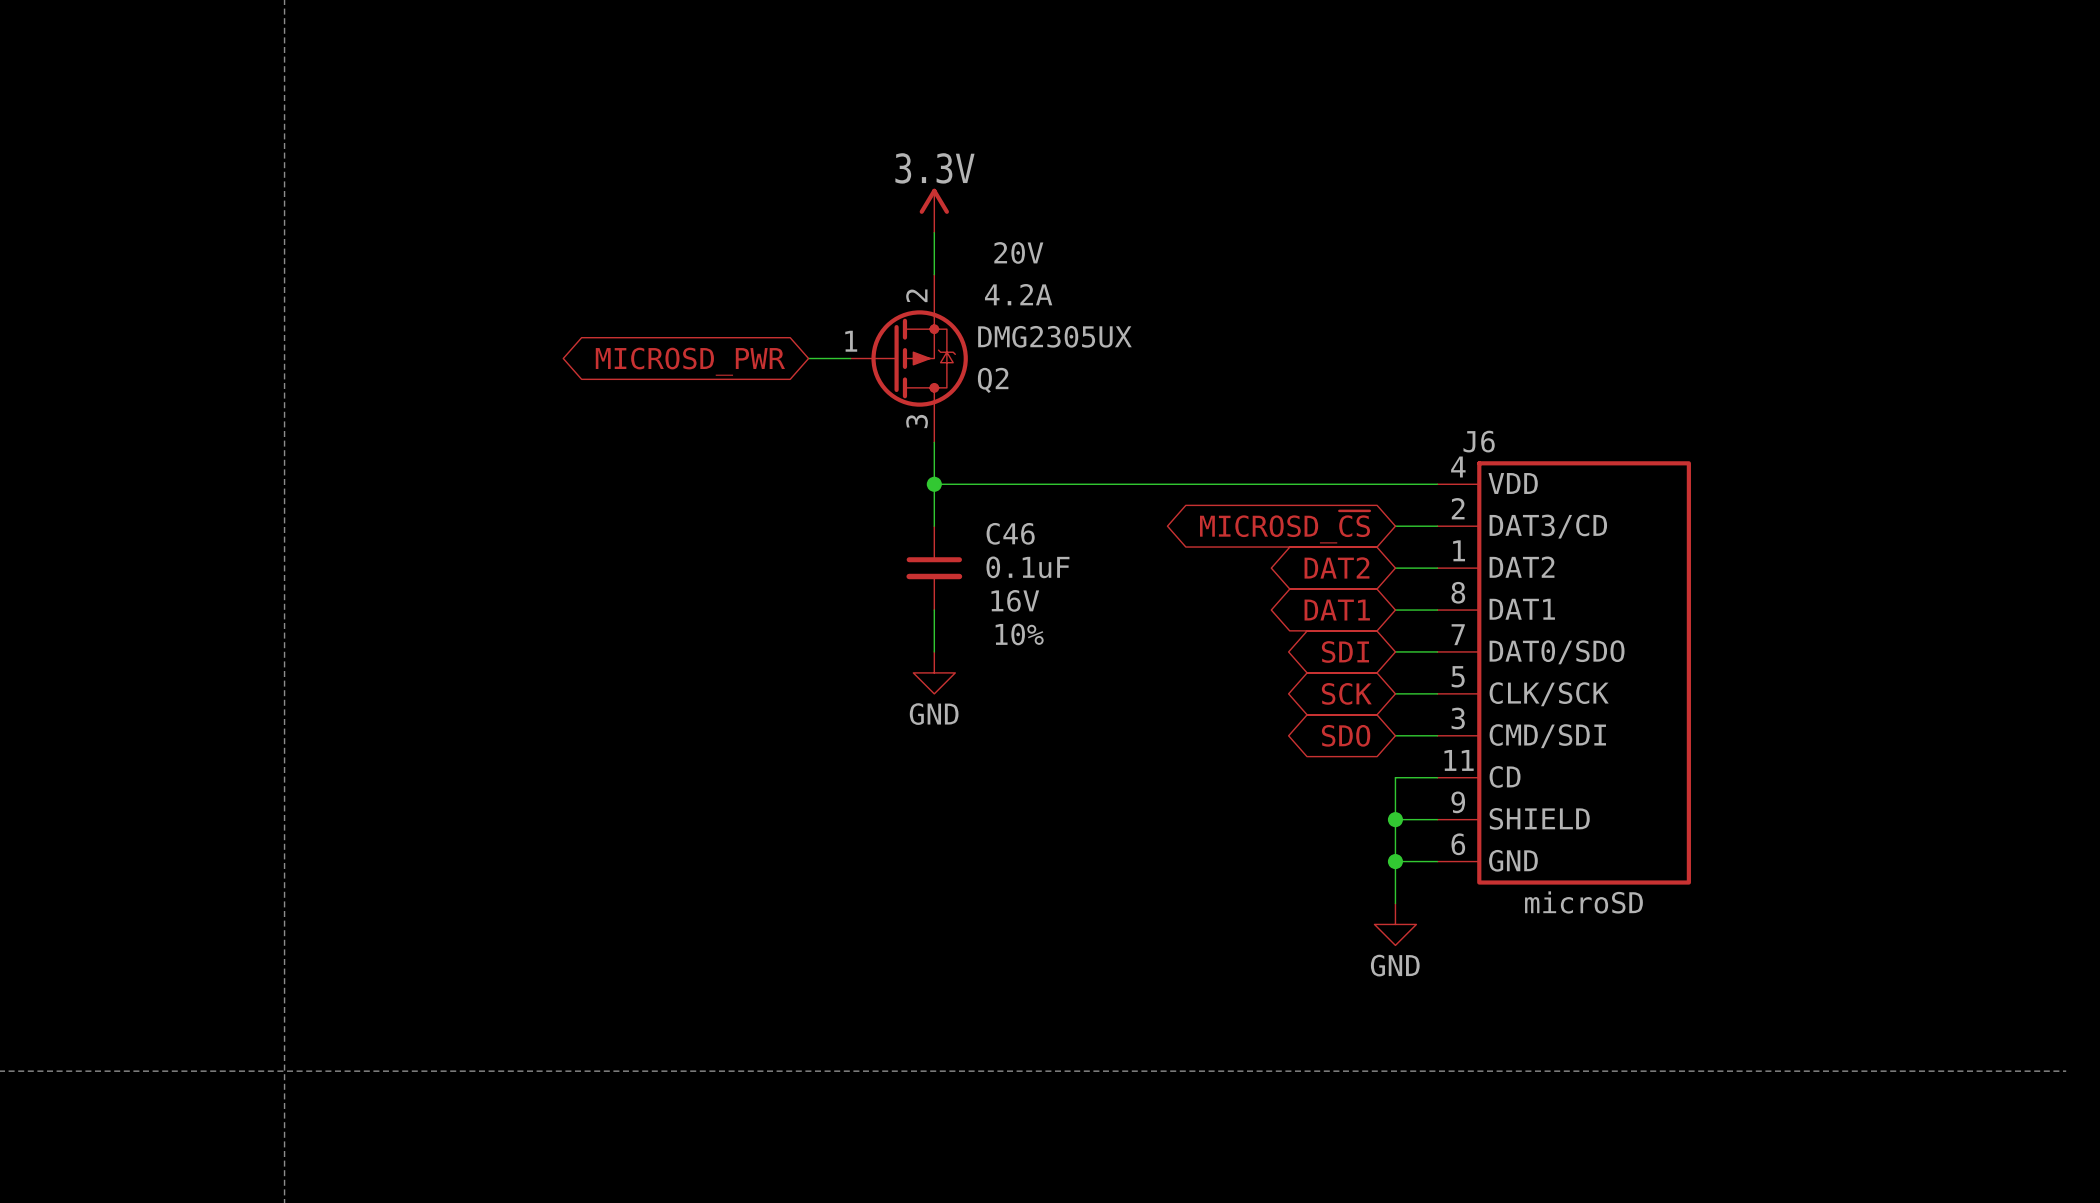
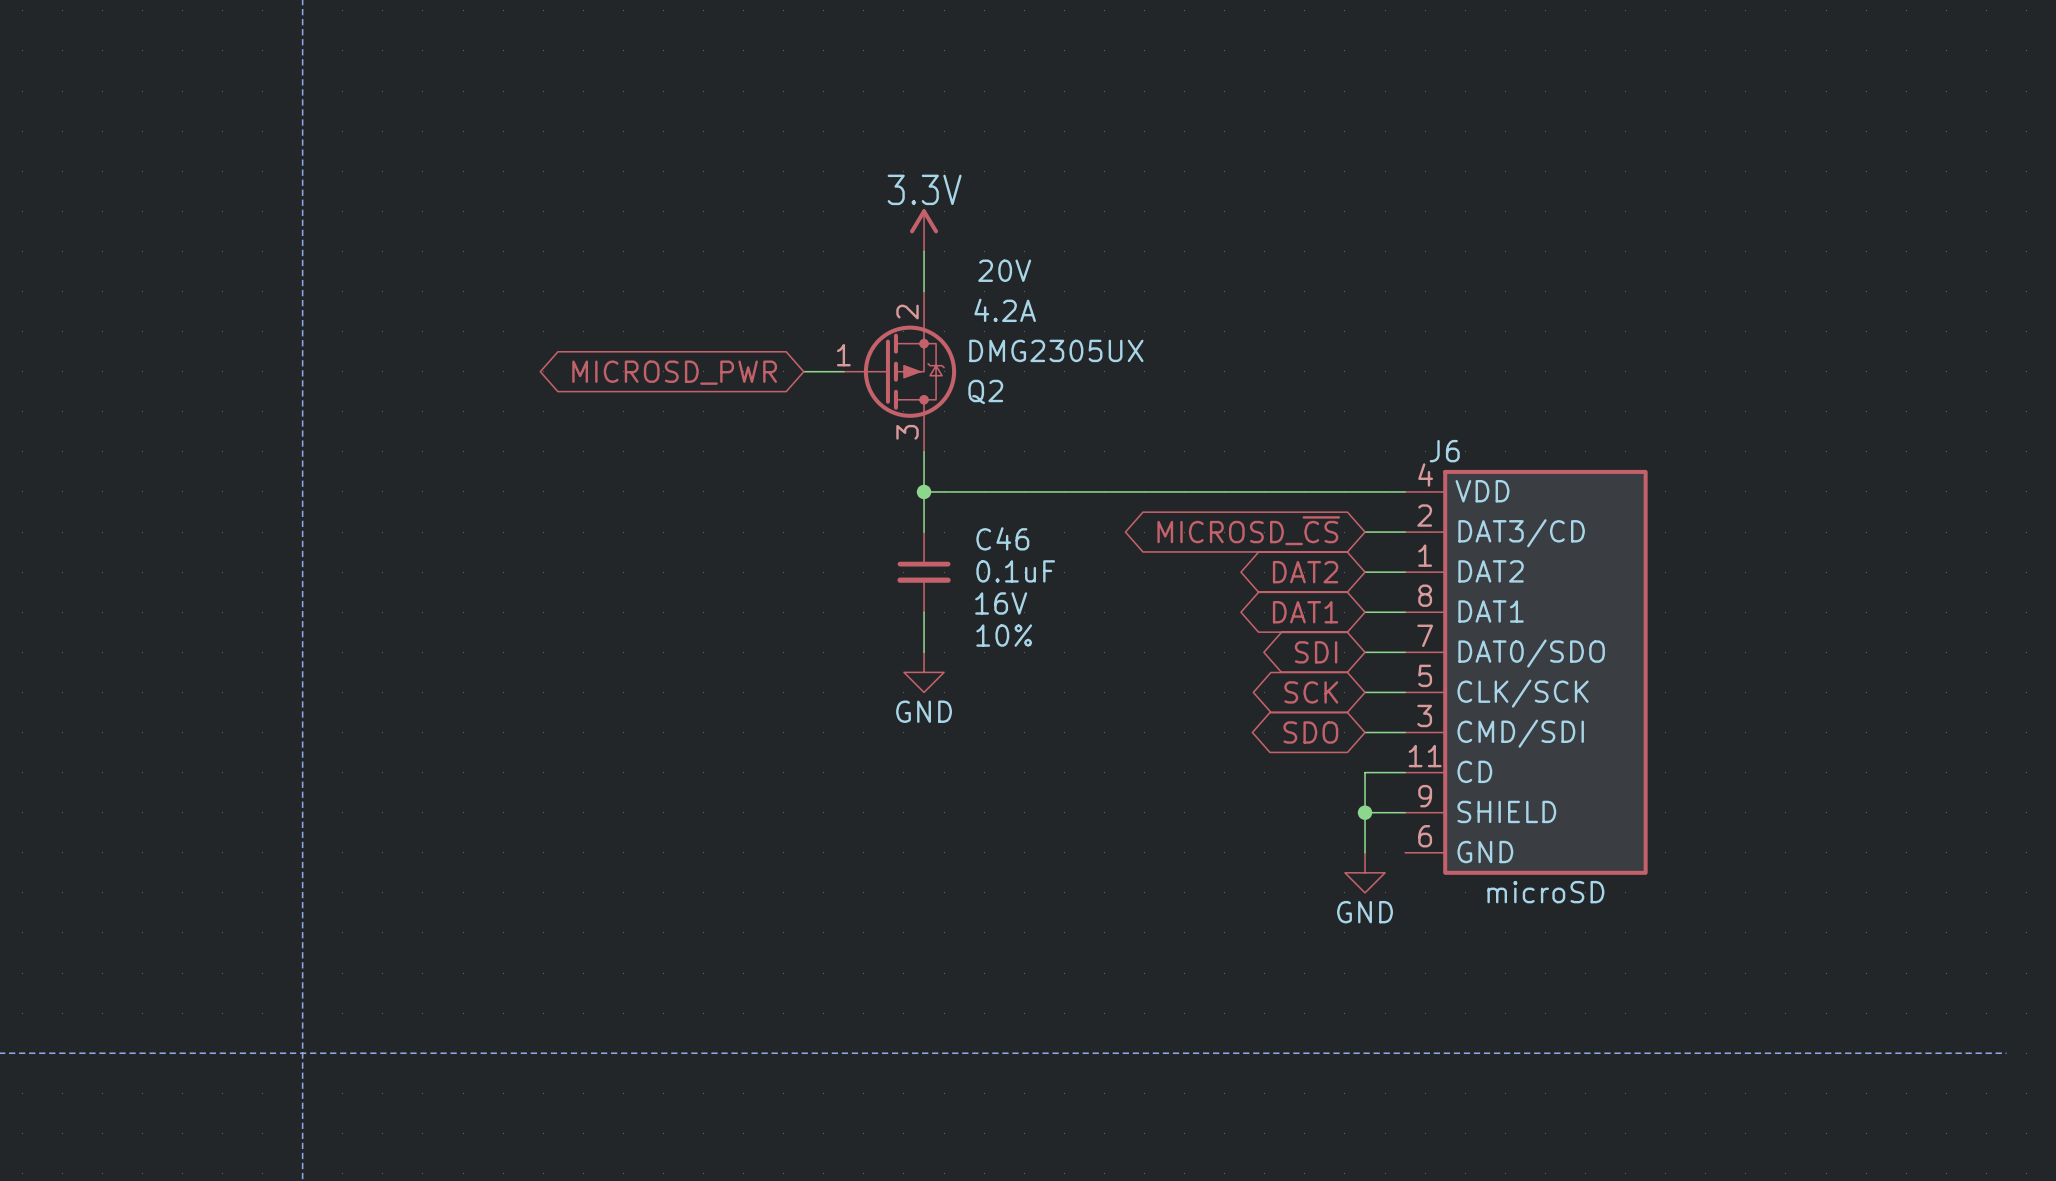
junction: (1395, 861) -> none
wire: (1437, 861) (1395, 861) (1395, 903) -> none
power symbol position: GND (1395, 924) -> GND (1365, 872)

